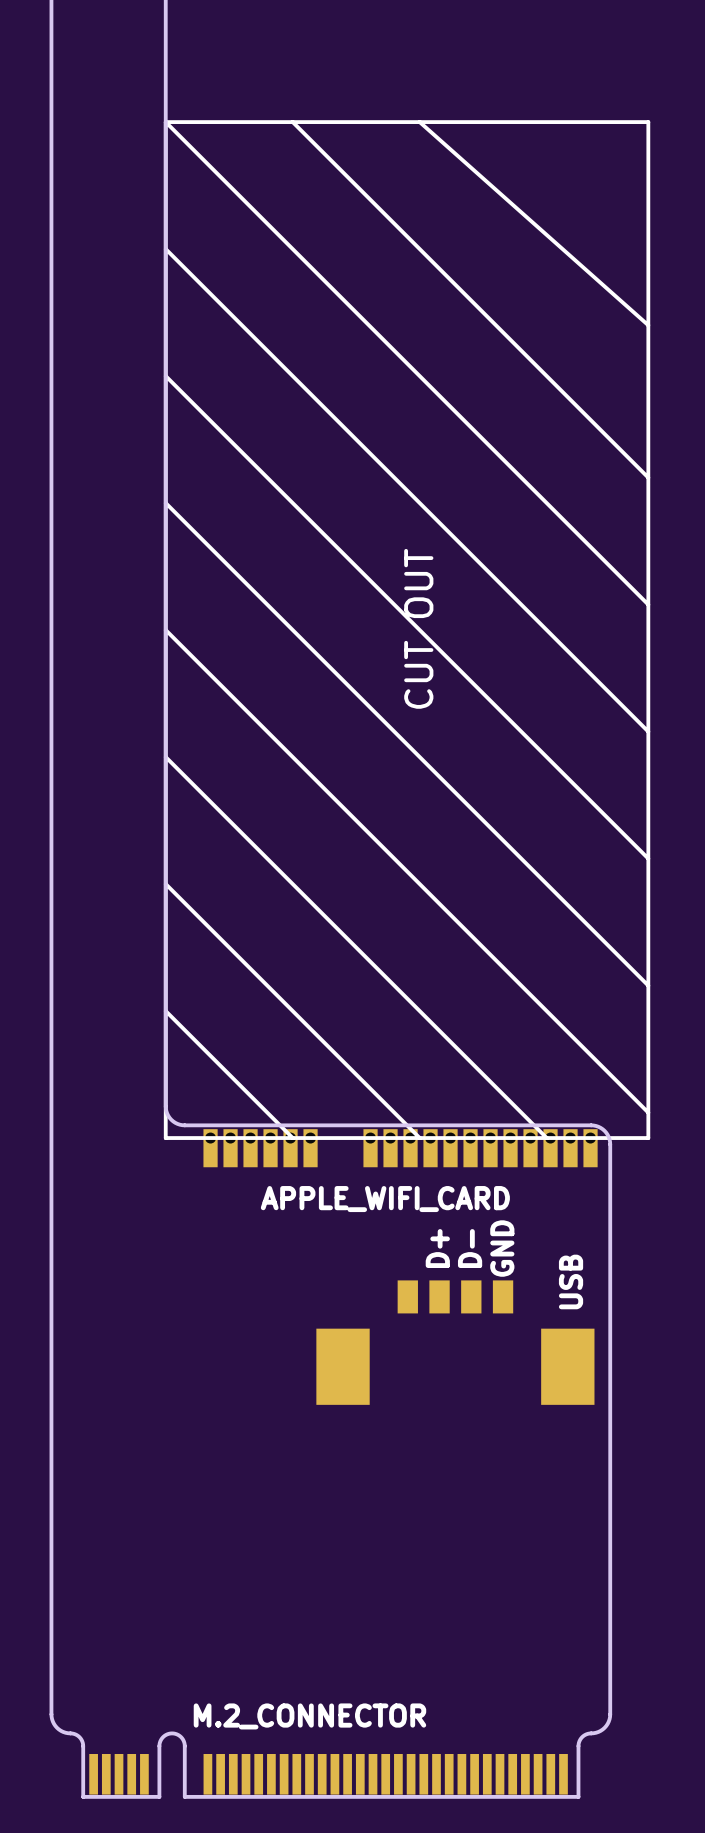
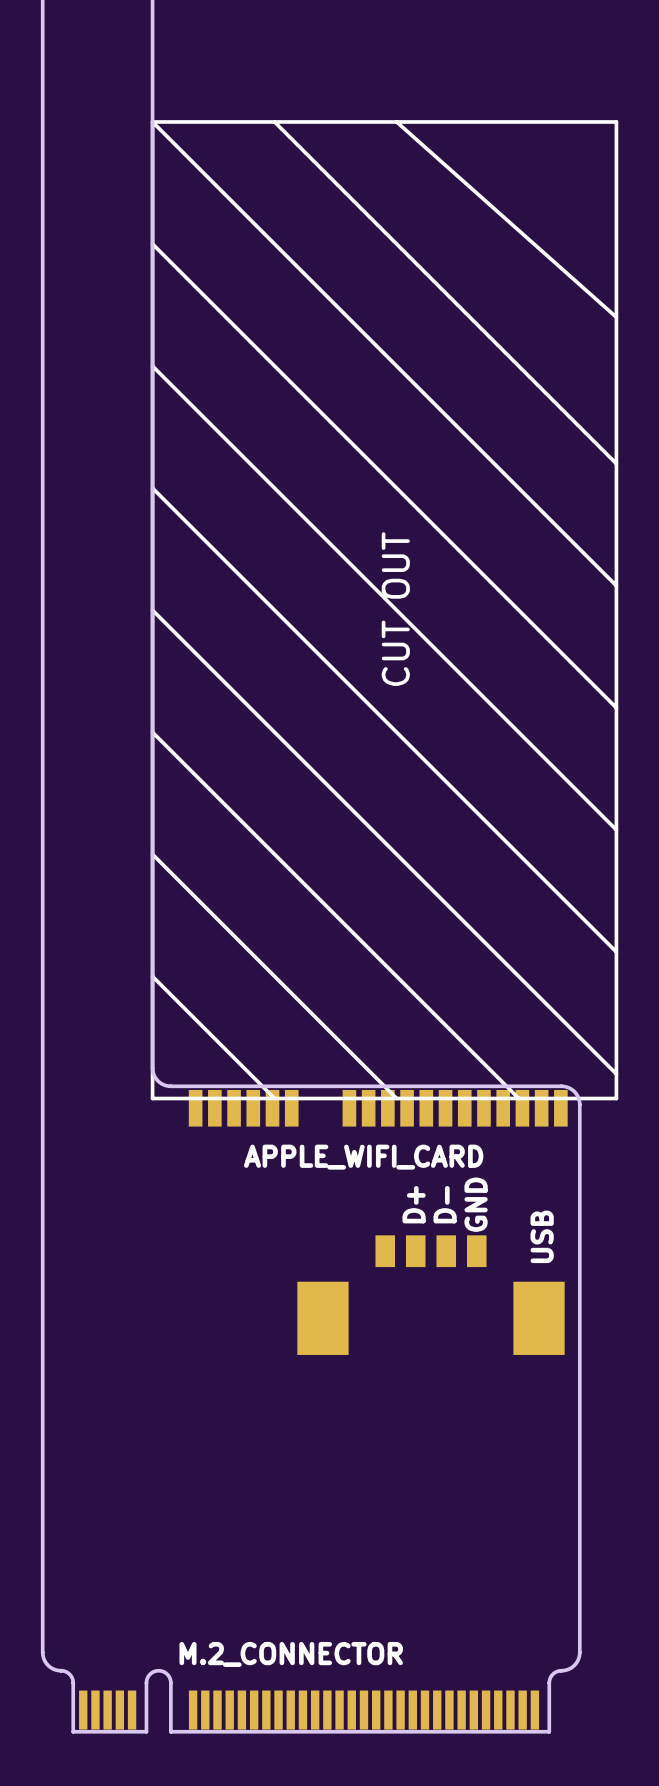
part footprint: [163, 120, 651, 1168] -> [150, 120, 619, 1127]

